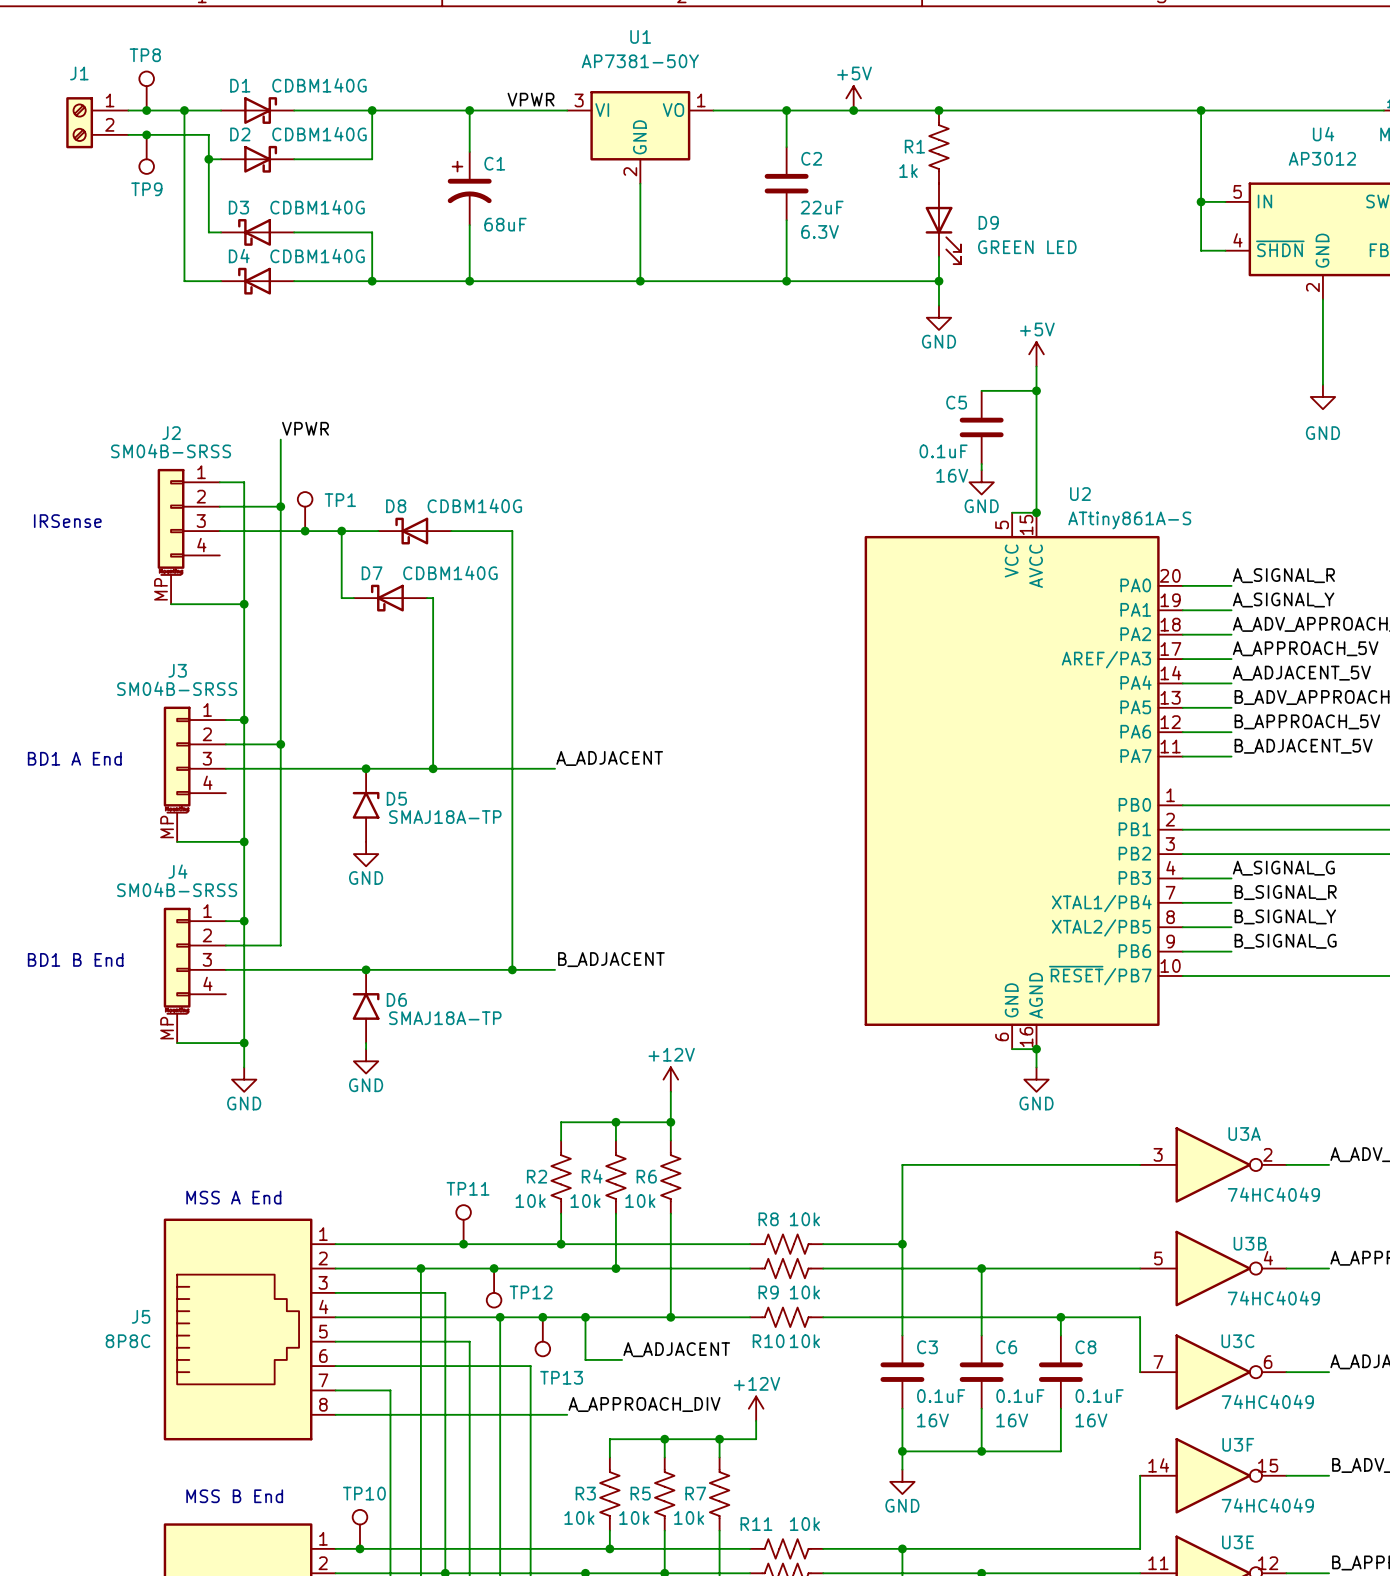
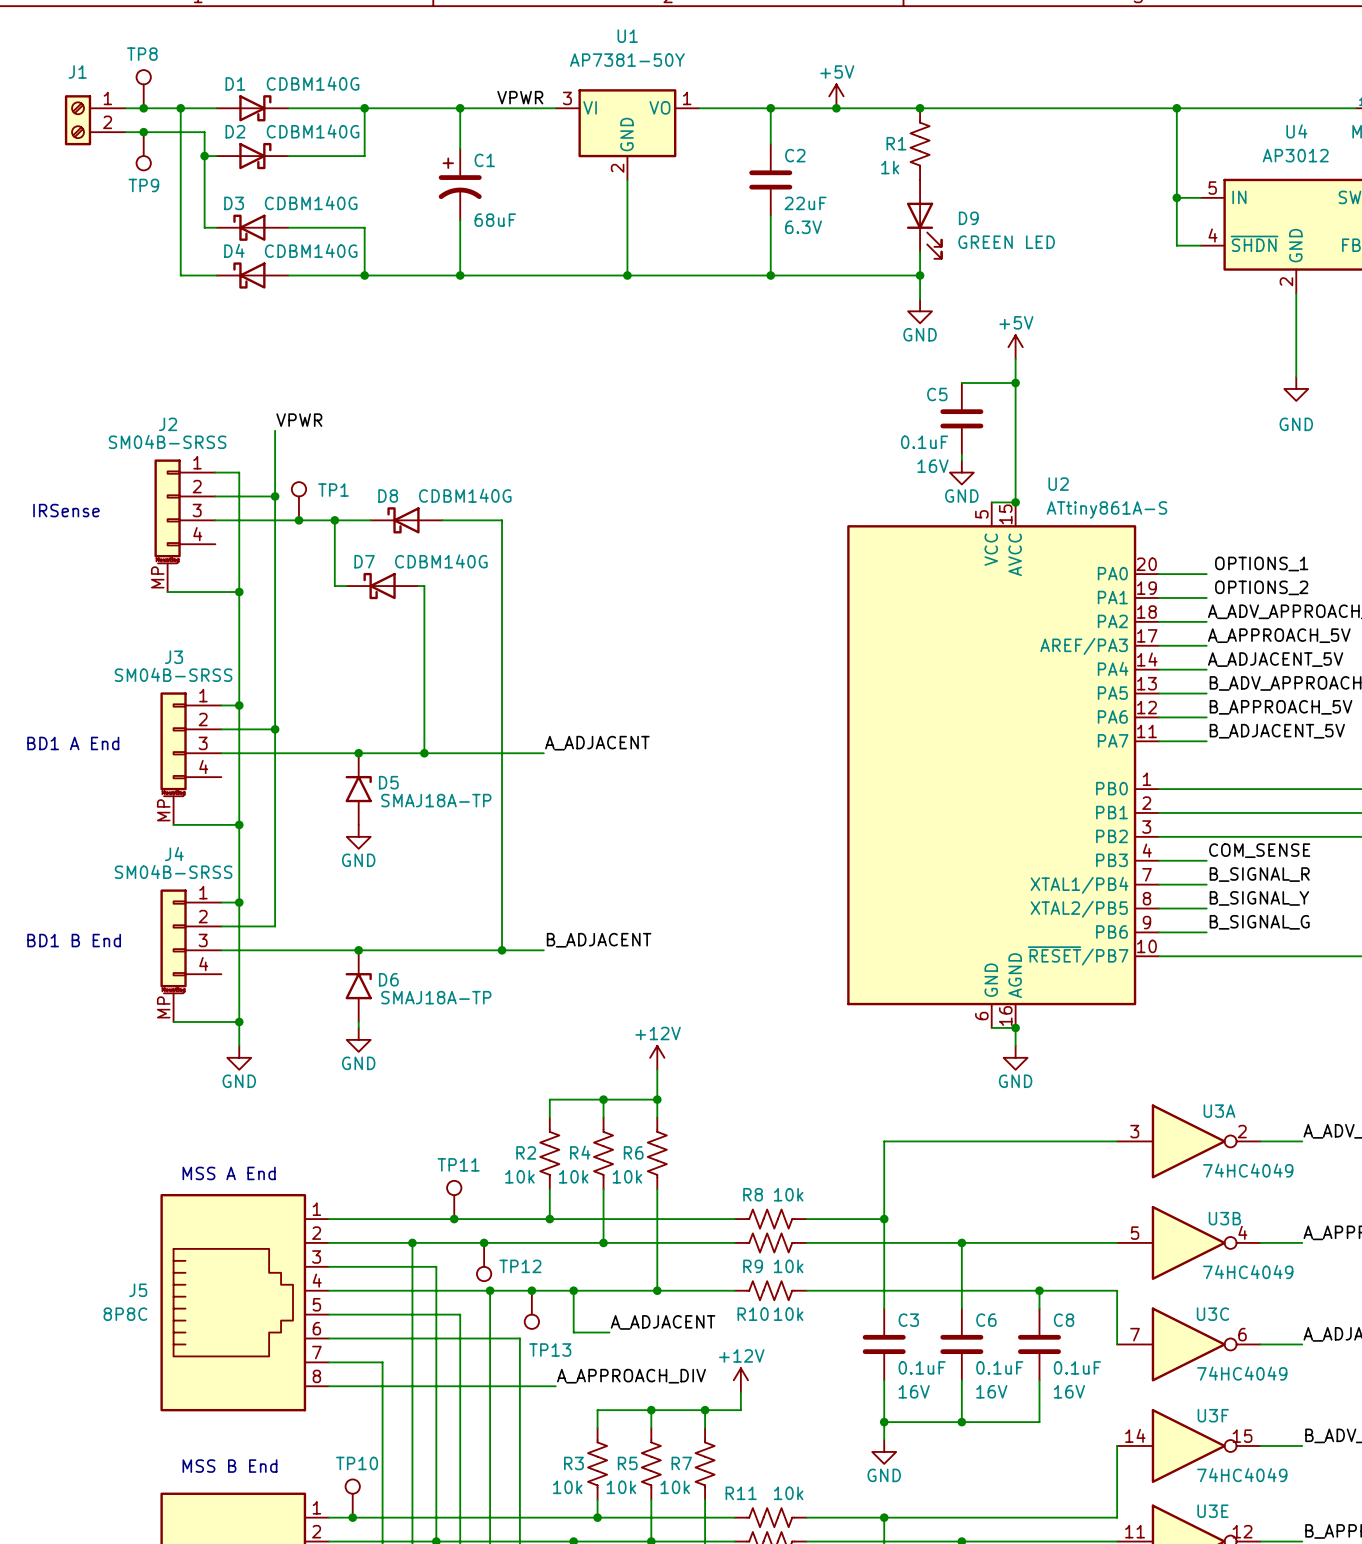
label: A_SIGNAL_R (1283, 575) -> OPTIONS_1 (1261, 564)
label: A_SIGNAL_Y (1283, 600) -> OPTIONS_2 (1261, 587)
label: A_SIGNAL_G (1283, 868) -> COM_SENSE (1259, 850)

